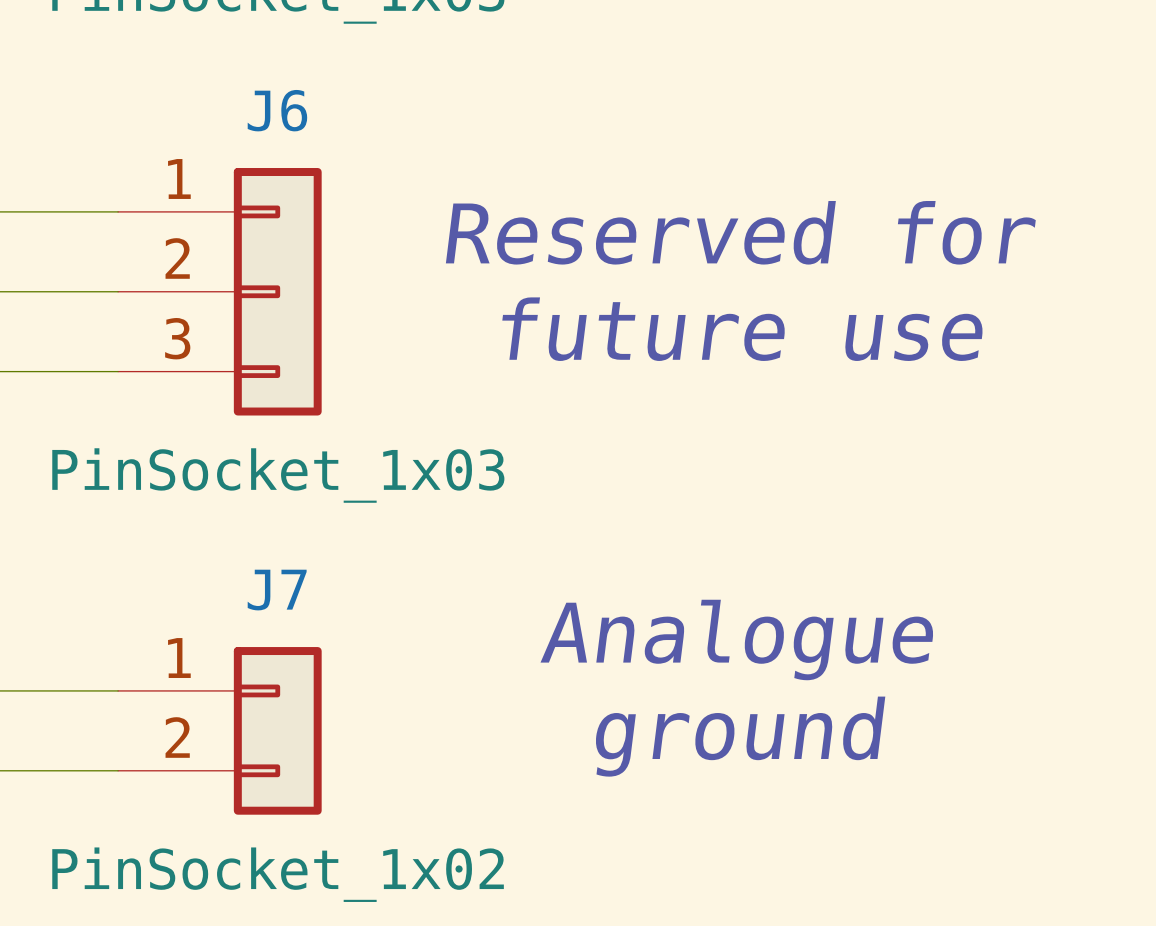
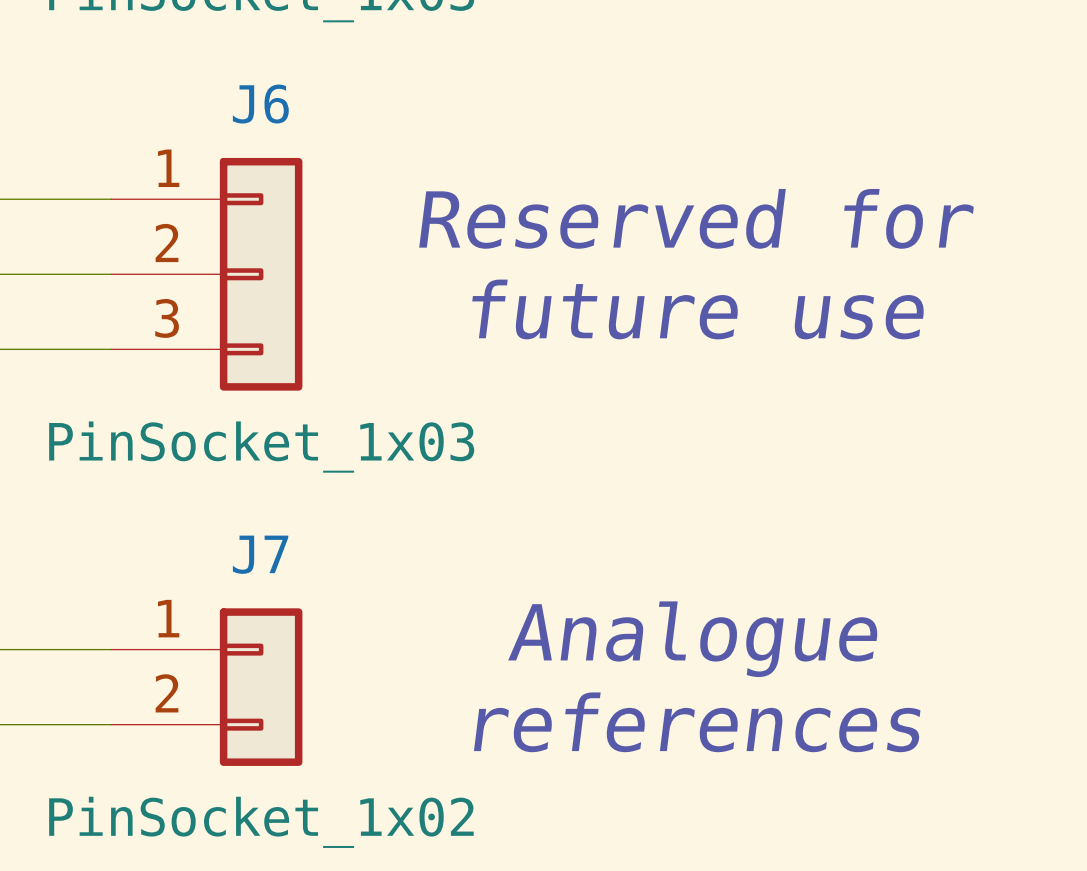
text position: Analogue (737, 639) -> Analogue (693, 639)
text: ground (740, 736) -> none
text: none -> references (697, 722)

